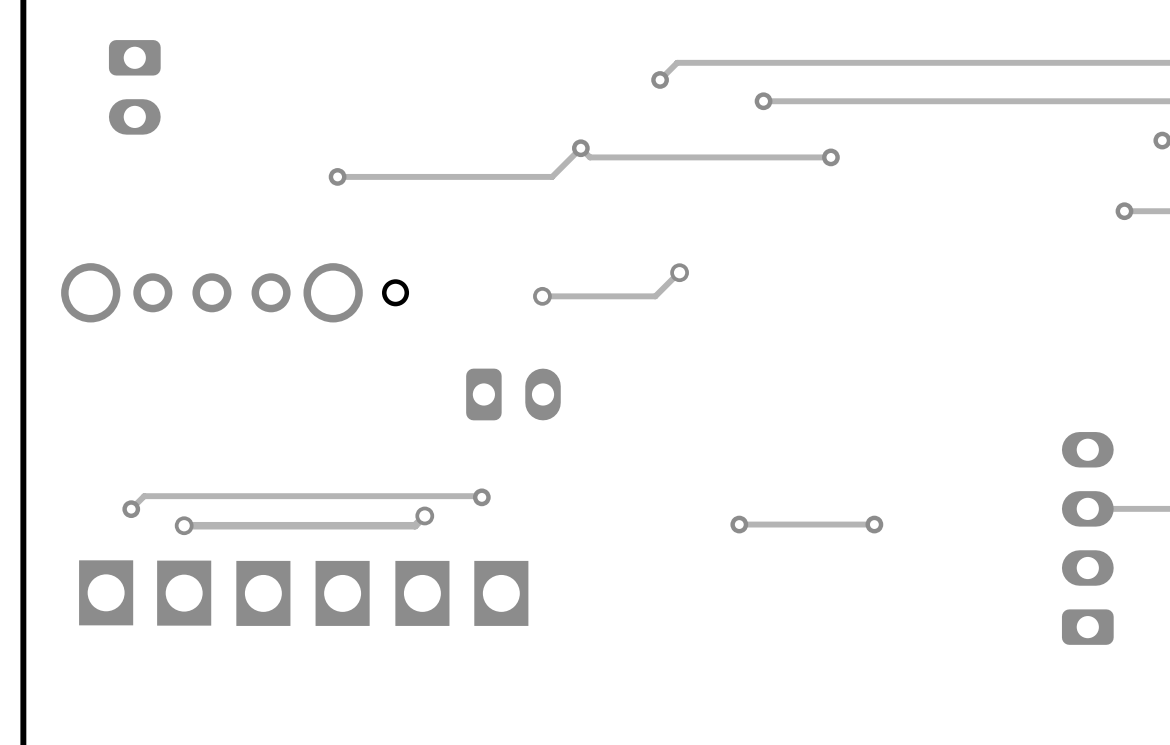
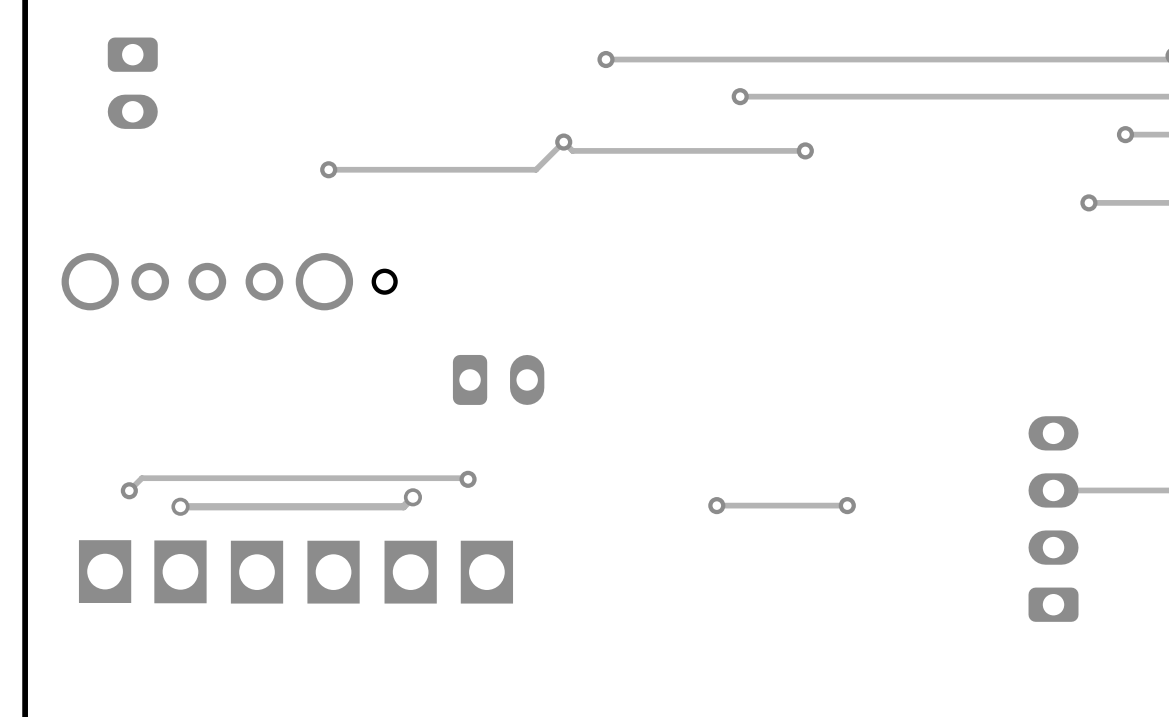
track: (677, 62) (660, 79) -> (656, 59) (606, 59)
via position: (660, 79) -> (606, 59)
track: (679, 272) (655, 296) (542, 296) -> none
via: (679, 272) -> none
via: (542, 296) -> none

